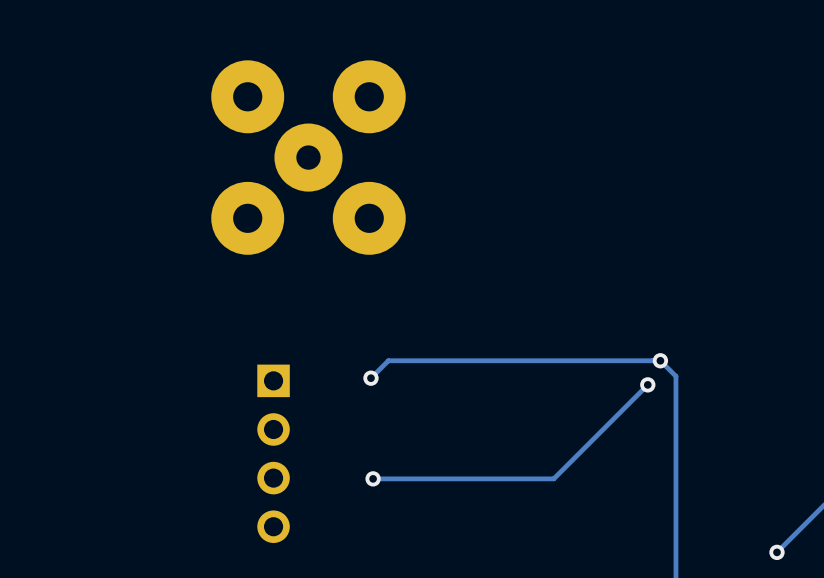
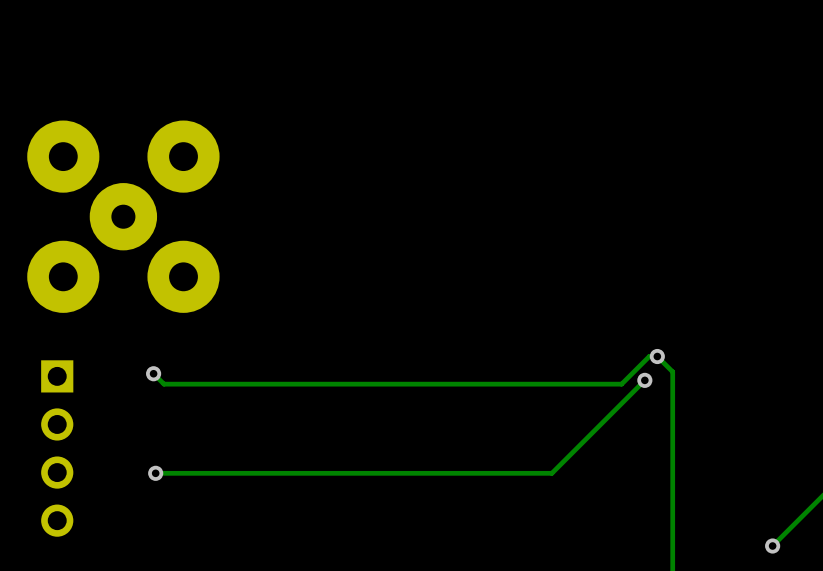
part position: (308, 157) -> (123, 216)
track: (652, 360) (388, 360) (370, 378) -> (649, 356) (621, 384) (164, 384) (153, 373)
via: none -> (153, 373)
via: (370, 378) -> none
part position: (273, 453) -> (57, 448)
via: none -> (155, 473)
track: none -> (373, 473) (155, 473)
via: (373, 478) -> none

